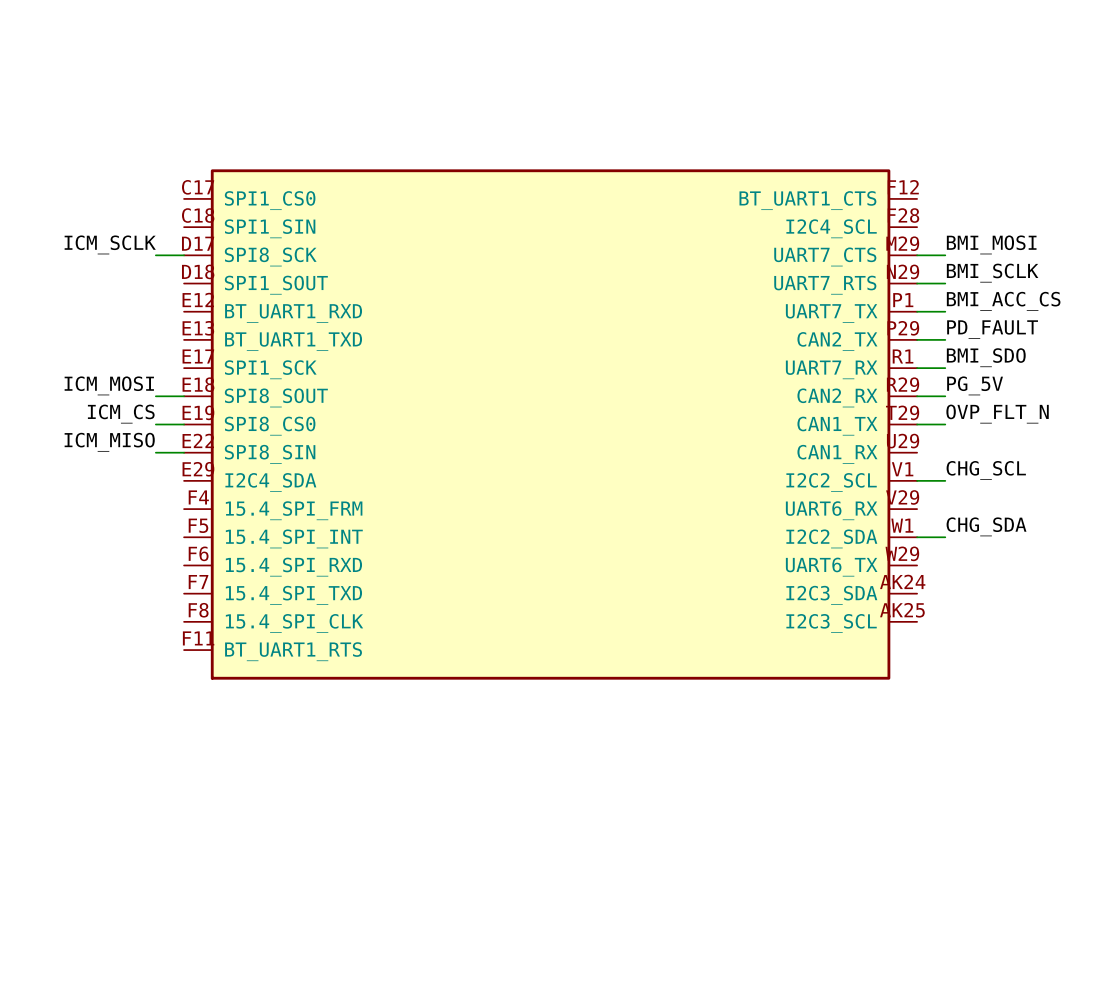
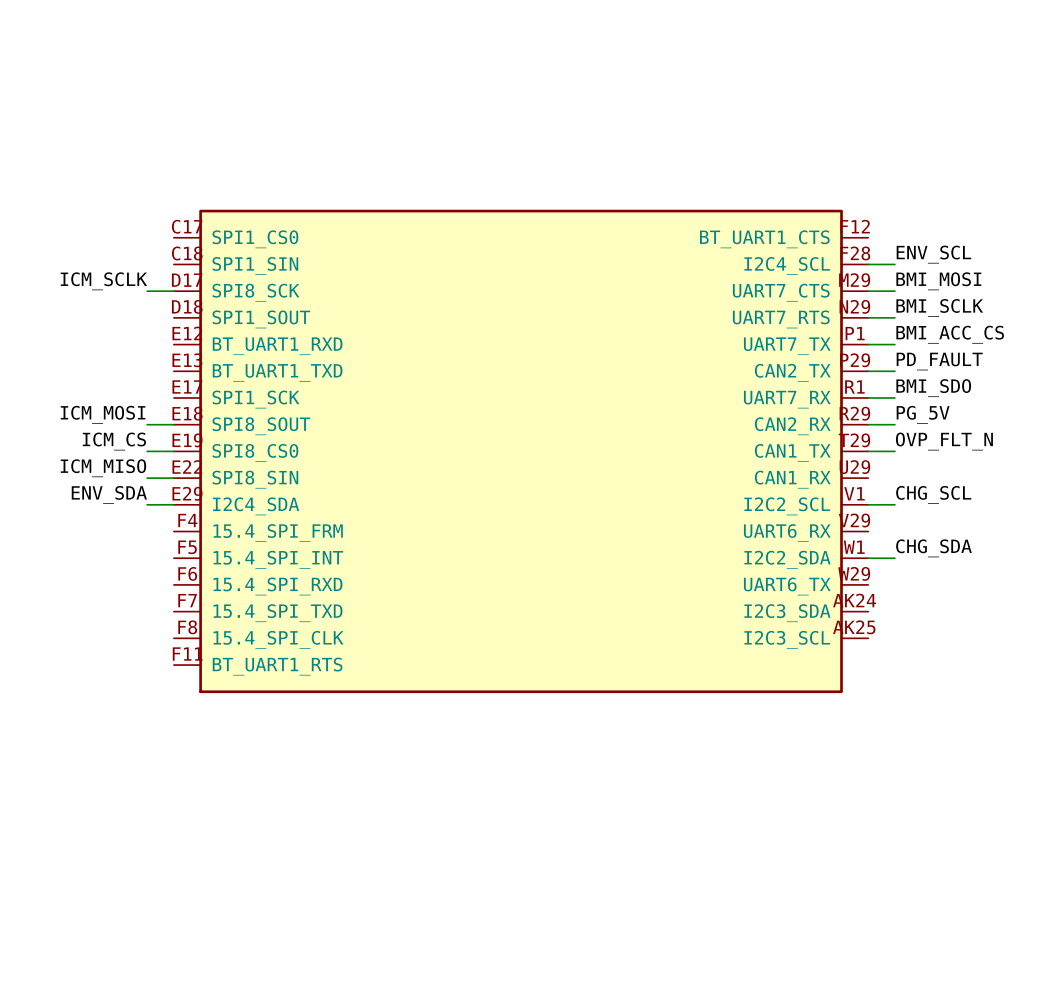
label: none -> ENV_SCL (933, 254)
wire: none -> (868, 264) (894, 264)
label: none -> ENV_SDA (109, 494)
wire: none -> (147, 504) (173, 504)

